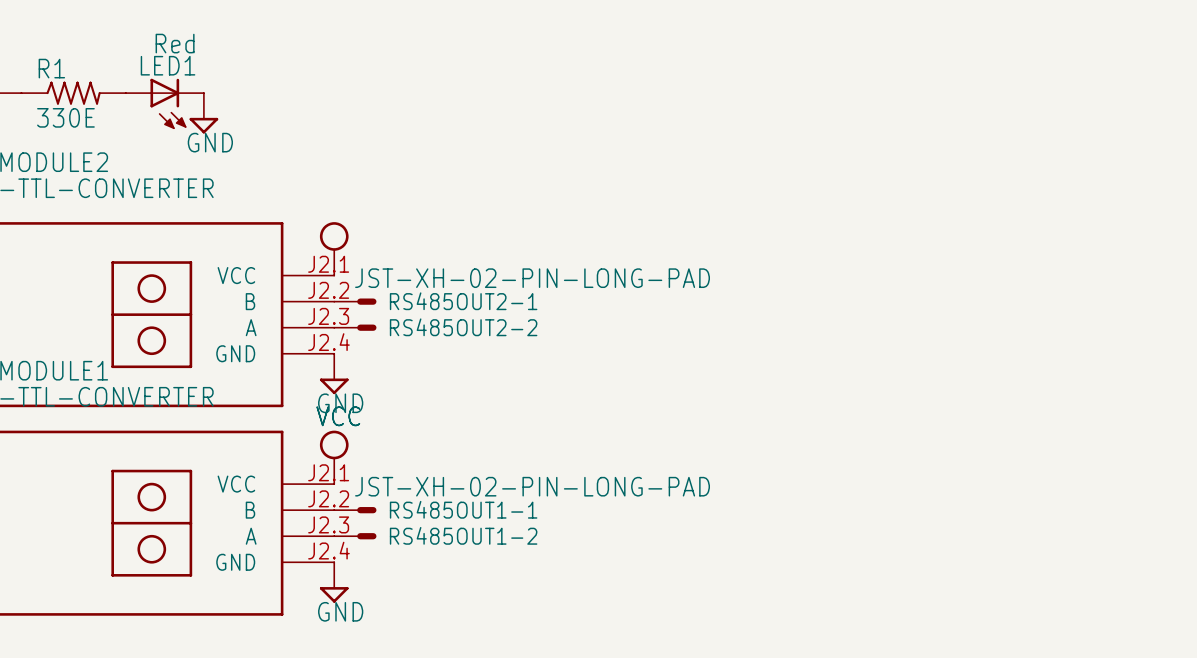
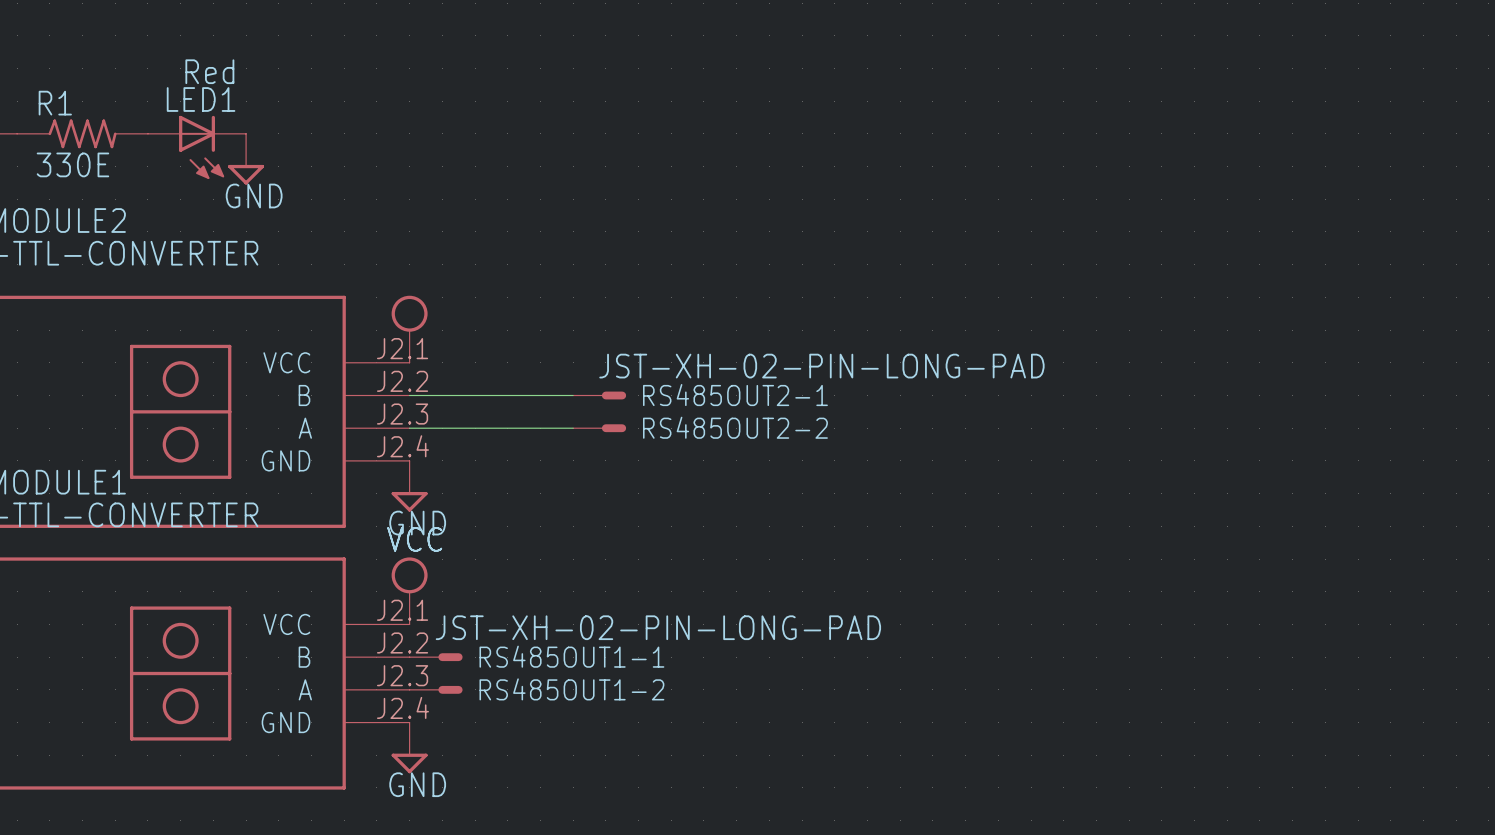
wire: none -> (409, 395) (573, 395)
RS485OUT2-1 position: (355, 301) -> (599, 395)
wire: none -> (409, 428) (573, 428)
RS485OUT2-2 position: (355, 327) -> (599, 428)

